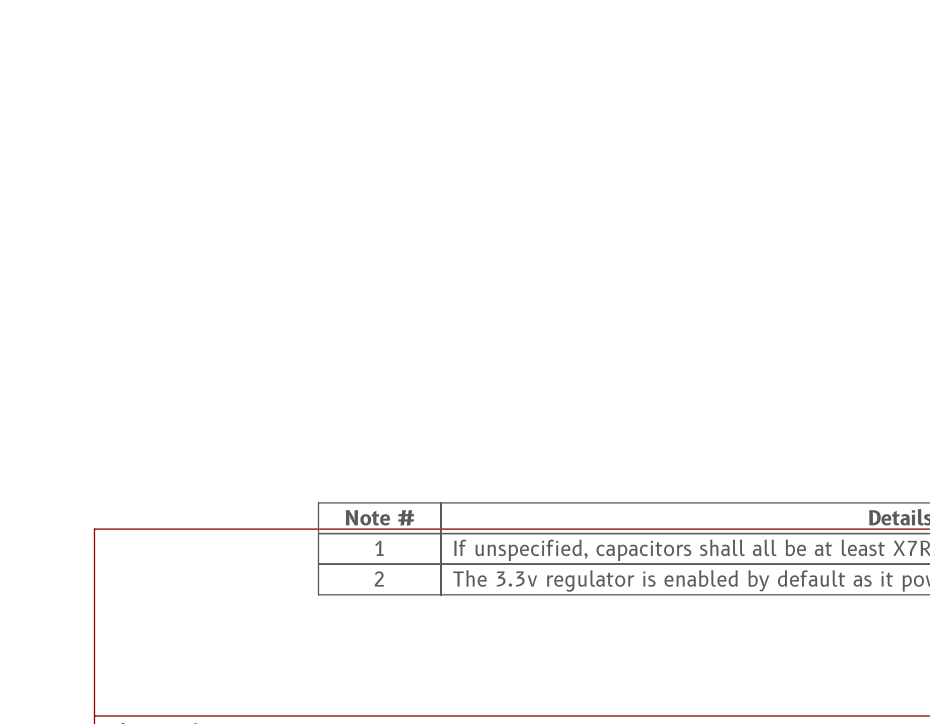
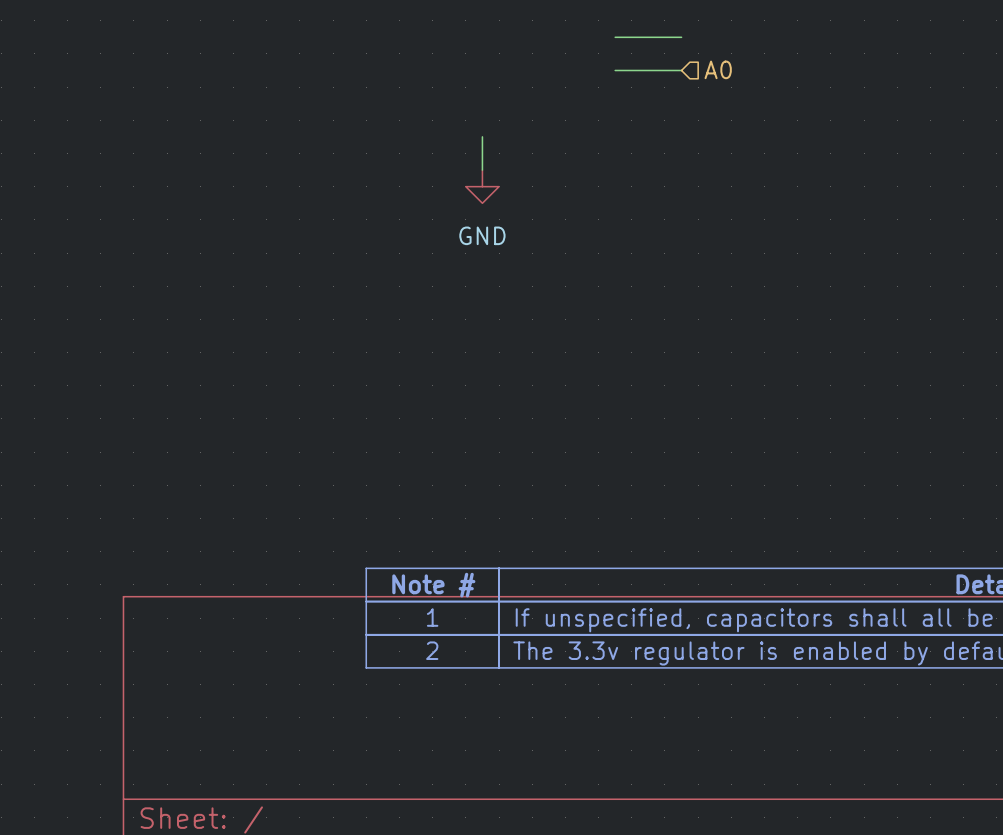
wire: none -> (615, 37) (681, 37)
wire: none -> (615, 70) (681, 70)
hierarchical label: none -> A0 (718, 69)
wire: none -> (482, 136) (482, 170)
power symbol: none -> GND (482, 186)

